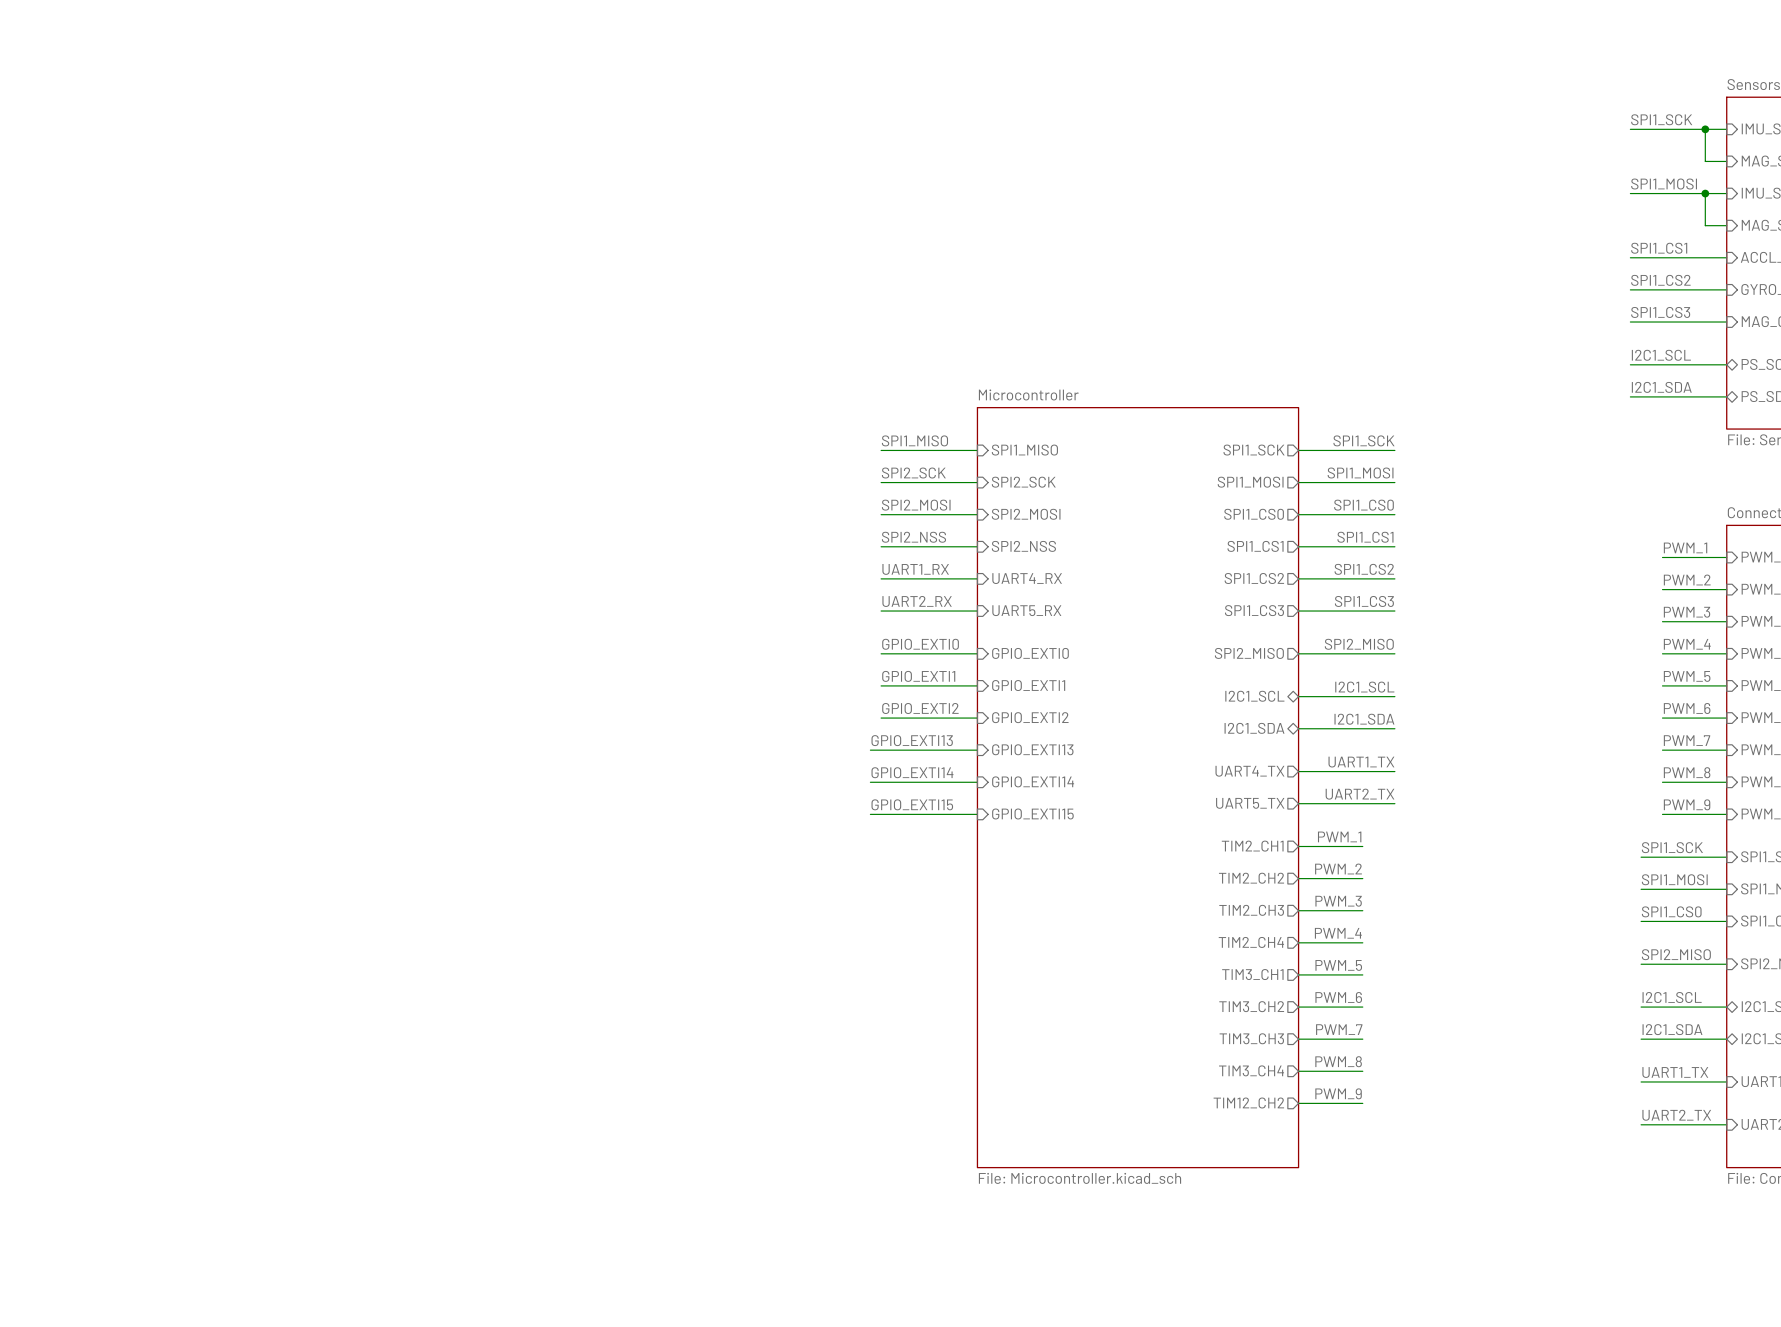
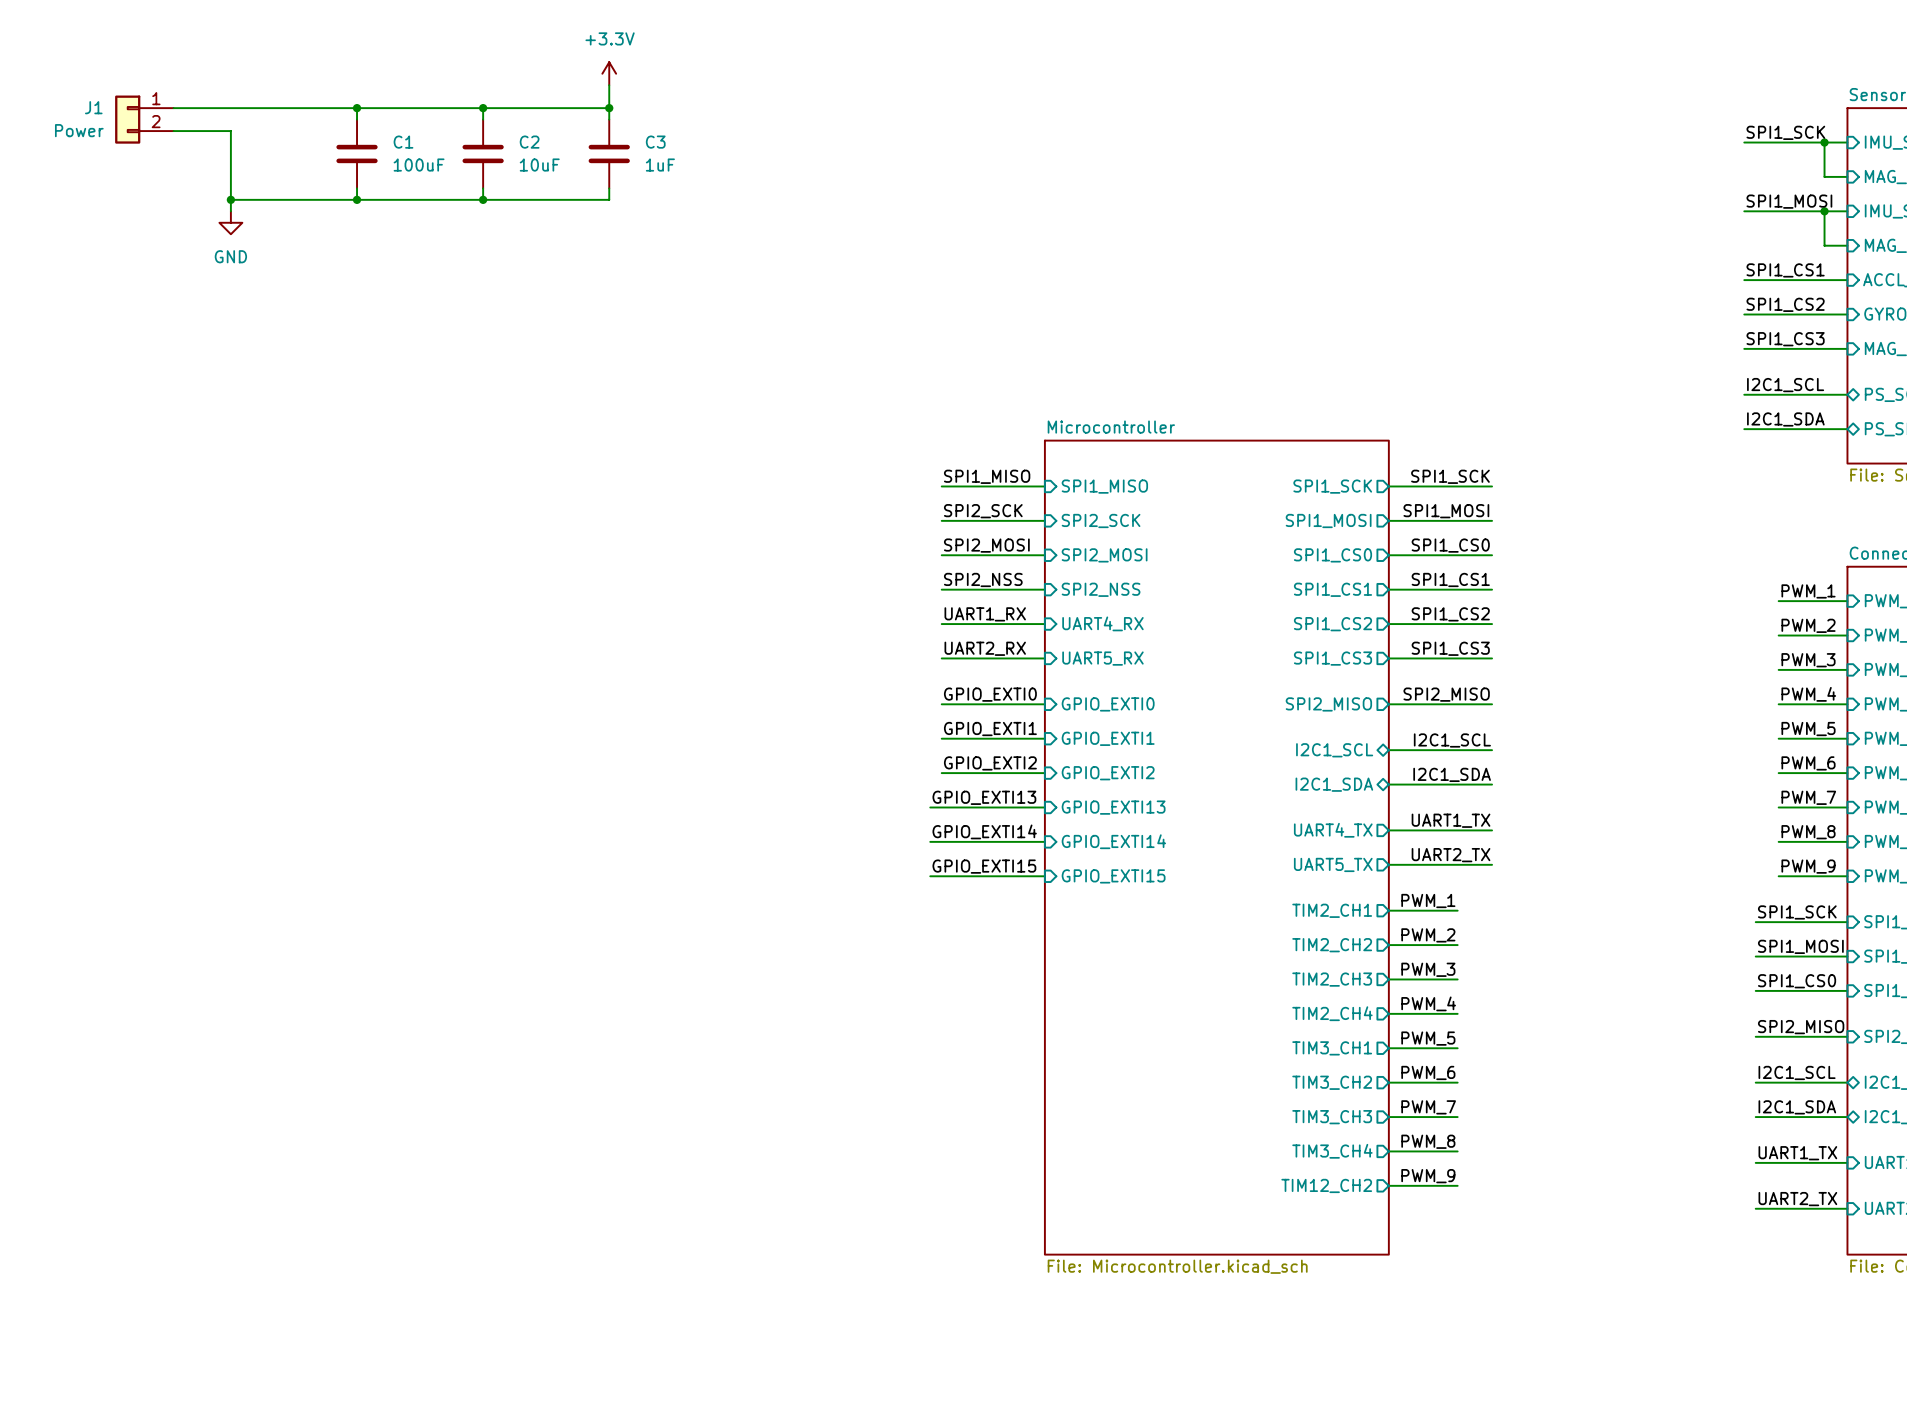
power symbol: none -> +3.3V (609, 73)
wire: none -> (609, 85) (609, 119)
wire: none -> (173, 108) (609, 108)
wire: none -> (357, 108) (357, 119)
junction: none -> (357, 108)
wire: none -> (483, 108) (483, 119)
junction: none -> (483, 108)
junction: none -> (609, 108)
J1: none -> Power (144, 119)
wire: none -> (173, 131) (230, 131) (230, 211)
C1: none -> 100uF (357, 153)
C2: none -> 10uF (483, 153)
C3: none -> 1uF (609, 153)
wire: none -> (357, 188) (357, 199)
wire: none -> (483, 188) (483, 199)
wire: none -> (609, 188) (609, 199) (230, 199)
junction: none -> (230, 199)
junction: none -> (357, 199)
junction: none -> (483, 199)
power symbol: none -> GND (230, 222)

